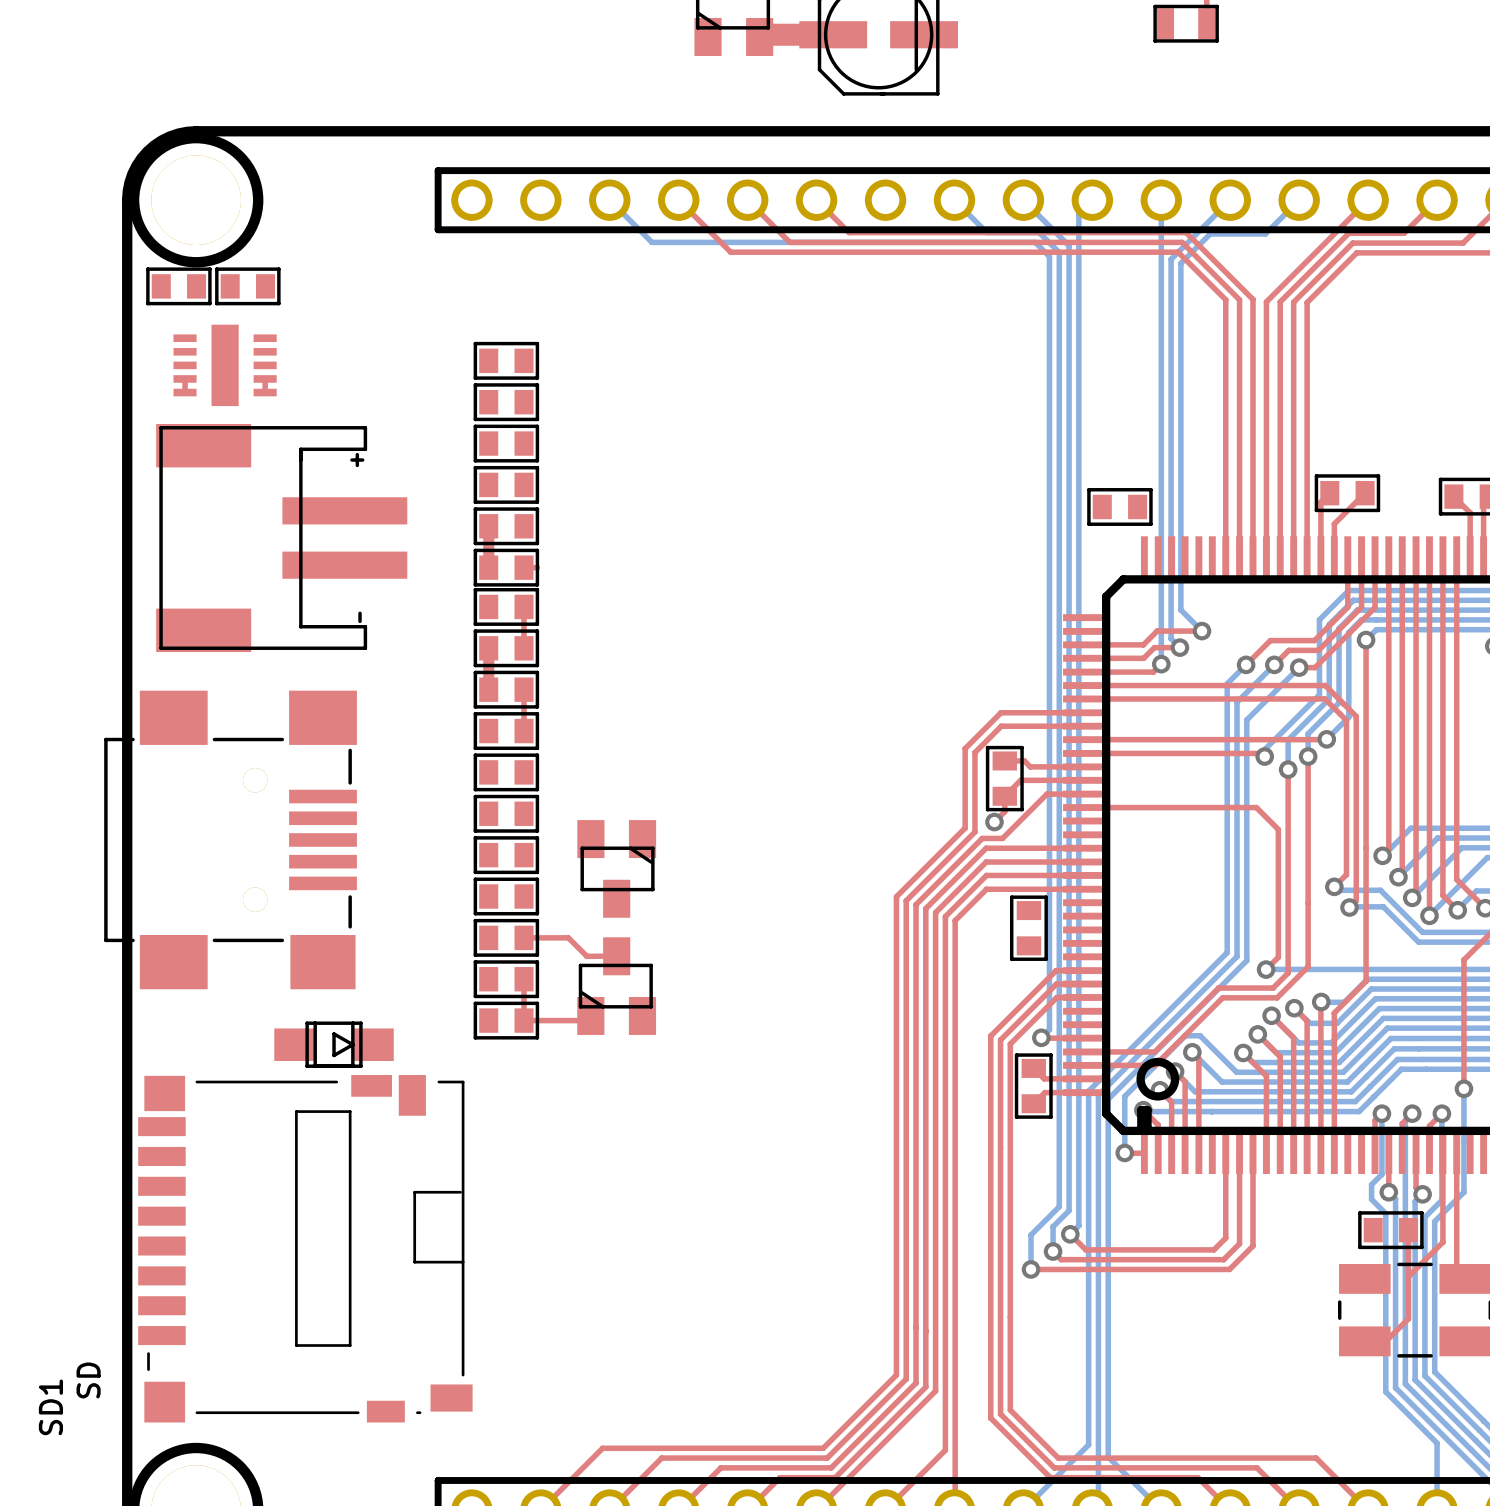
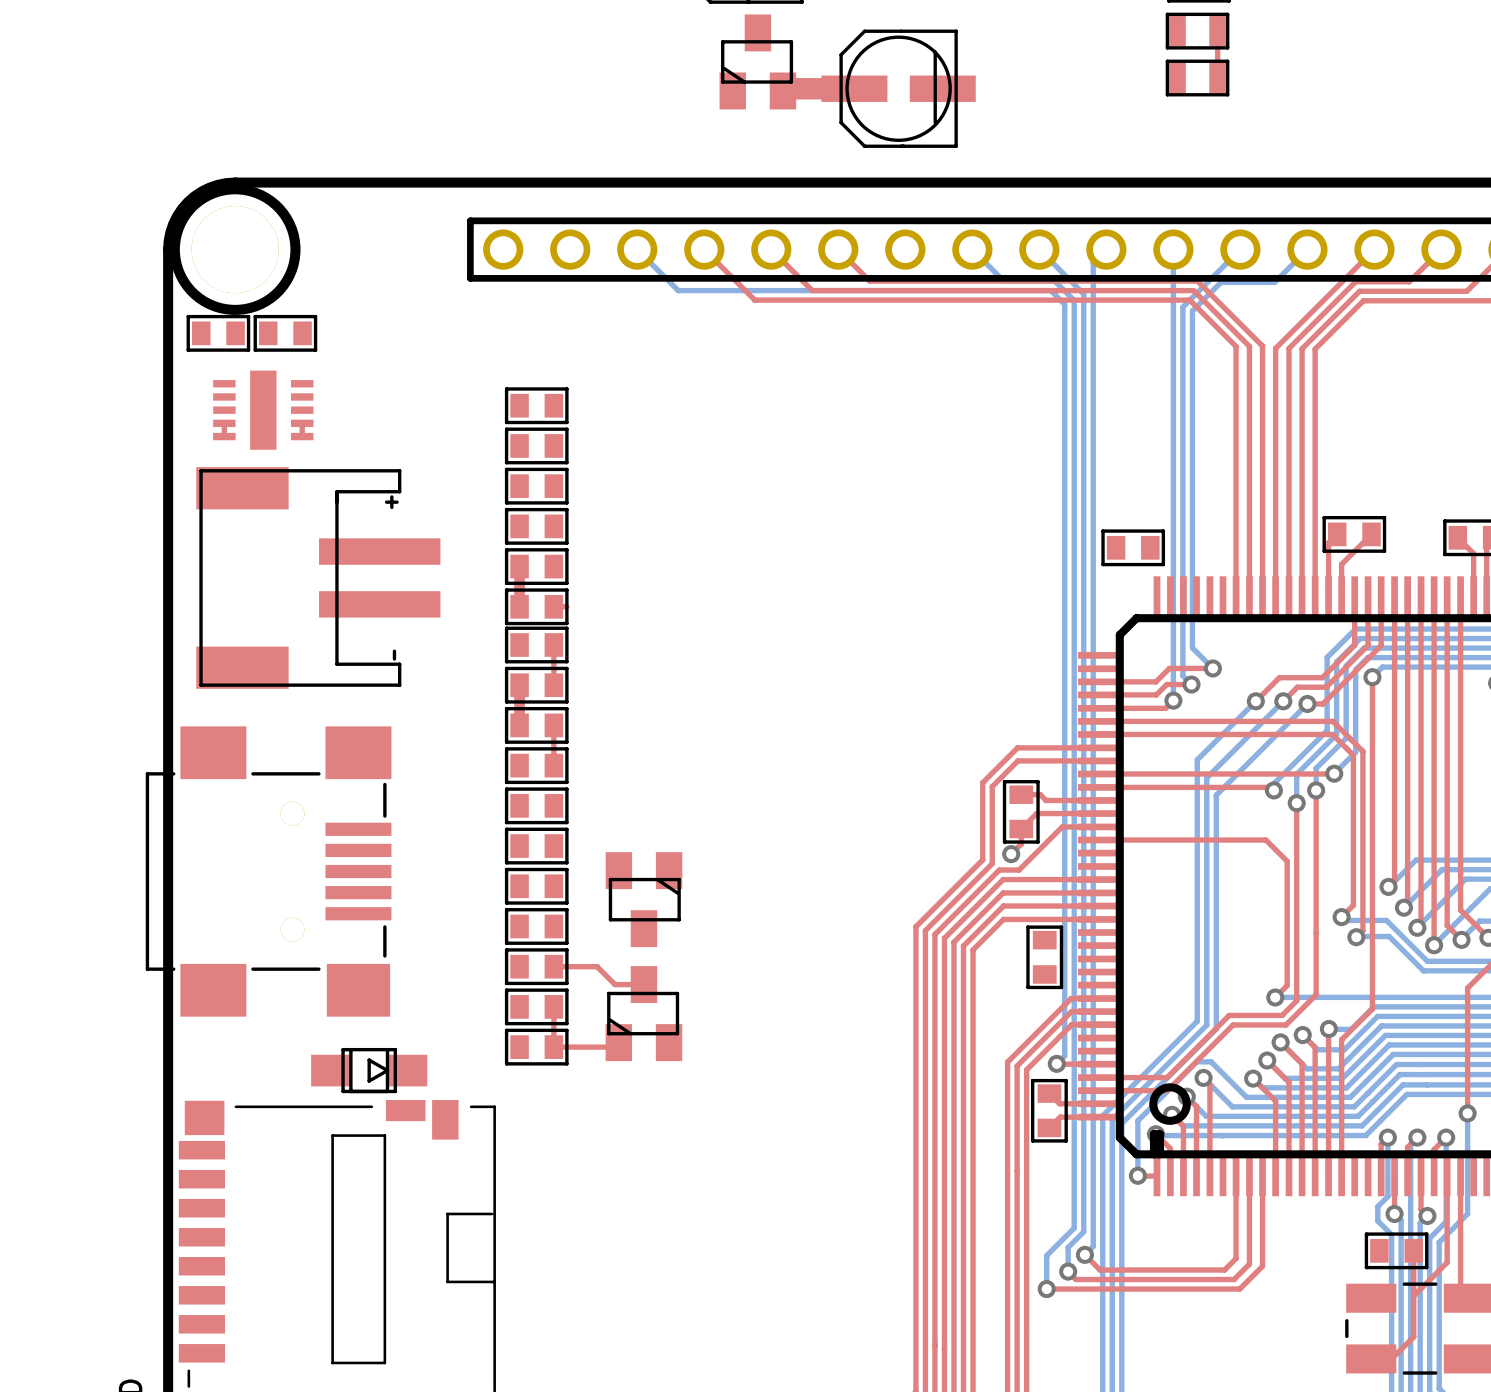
bottom track: (1227, 683) (1227, 952) (1185, 993) -> (1237, 719) (1197, 759) (1197, 1021)
bottom track: (1237, 702) (1237, 956) (1195, 997) -> (1246, 737) (1206, 777) (1206, 1025)
bottom track: (1246, 720) (1246, 960) (1205, 1001) -> (1256, 754) (1216, 795) (1216, 1029)

